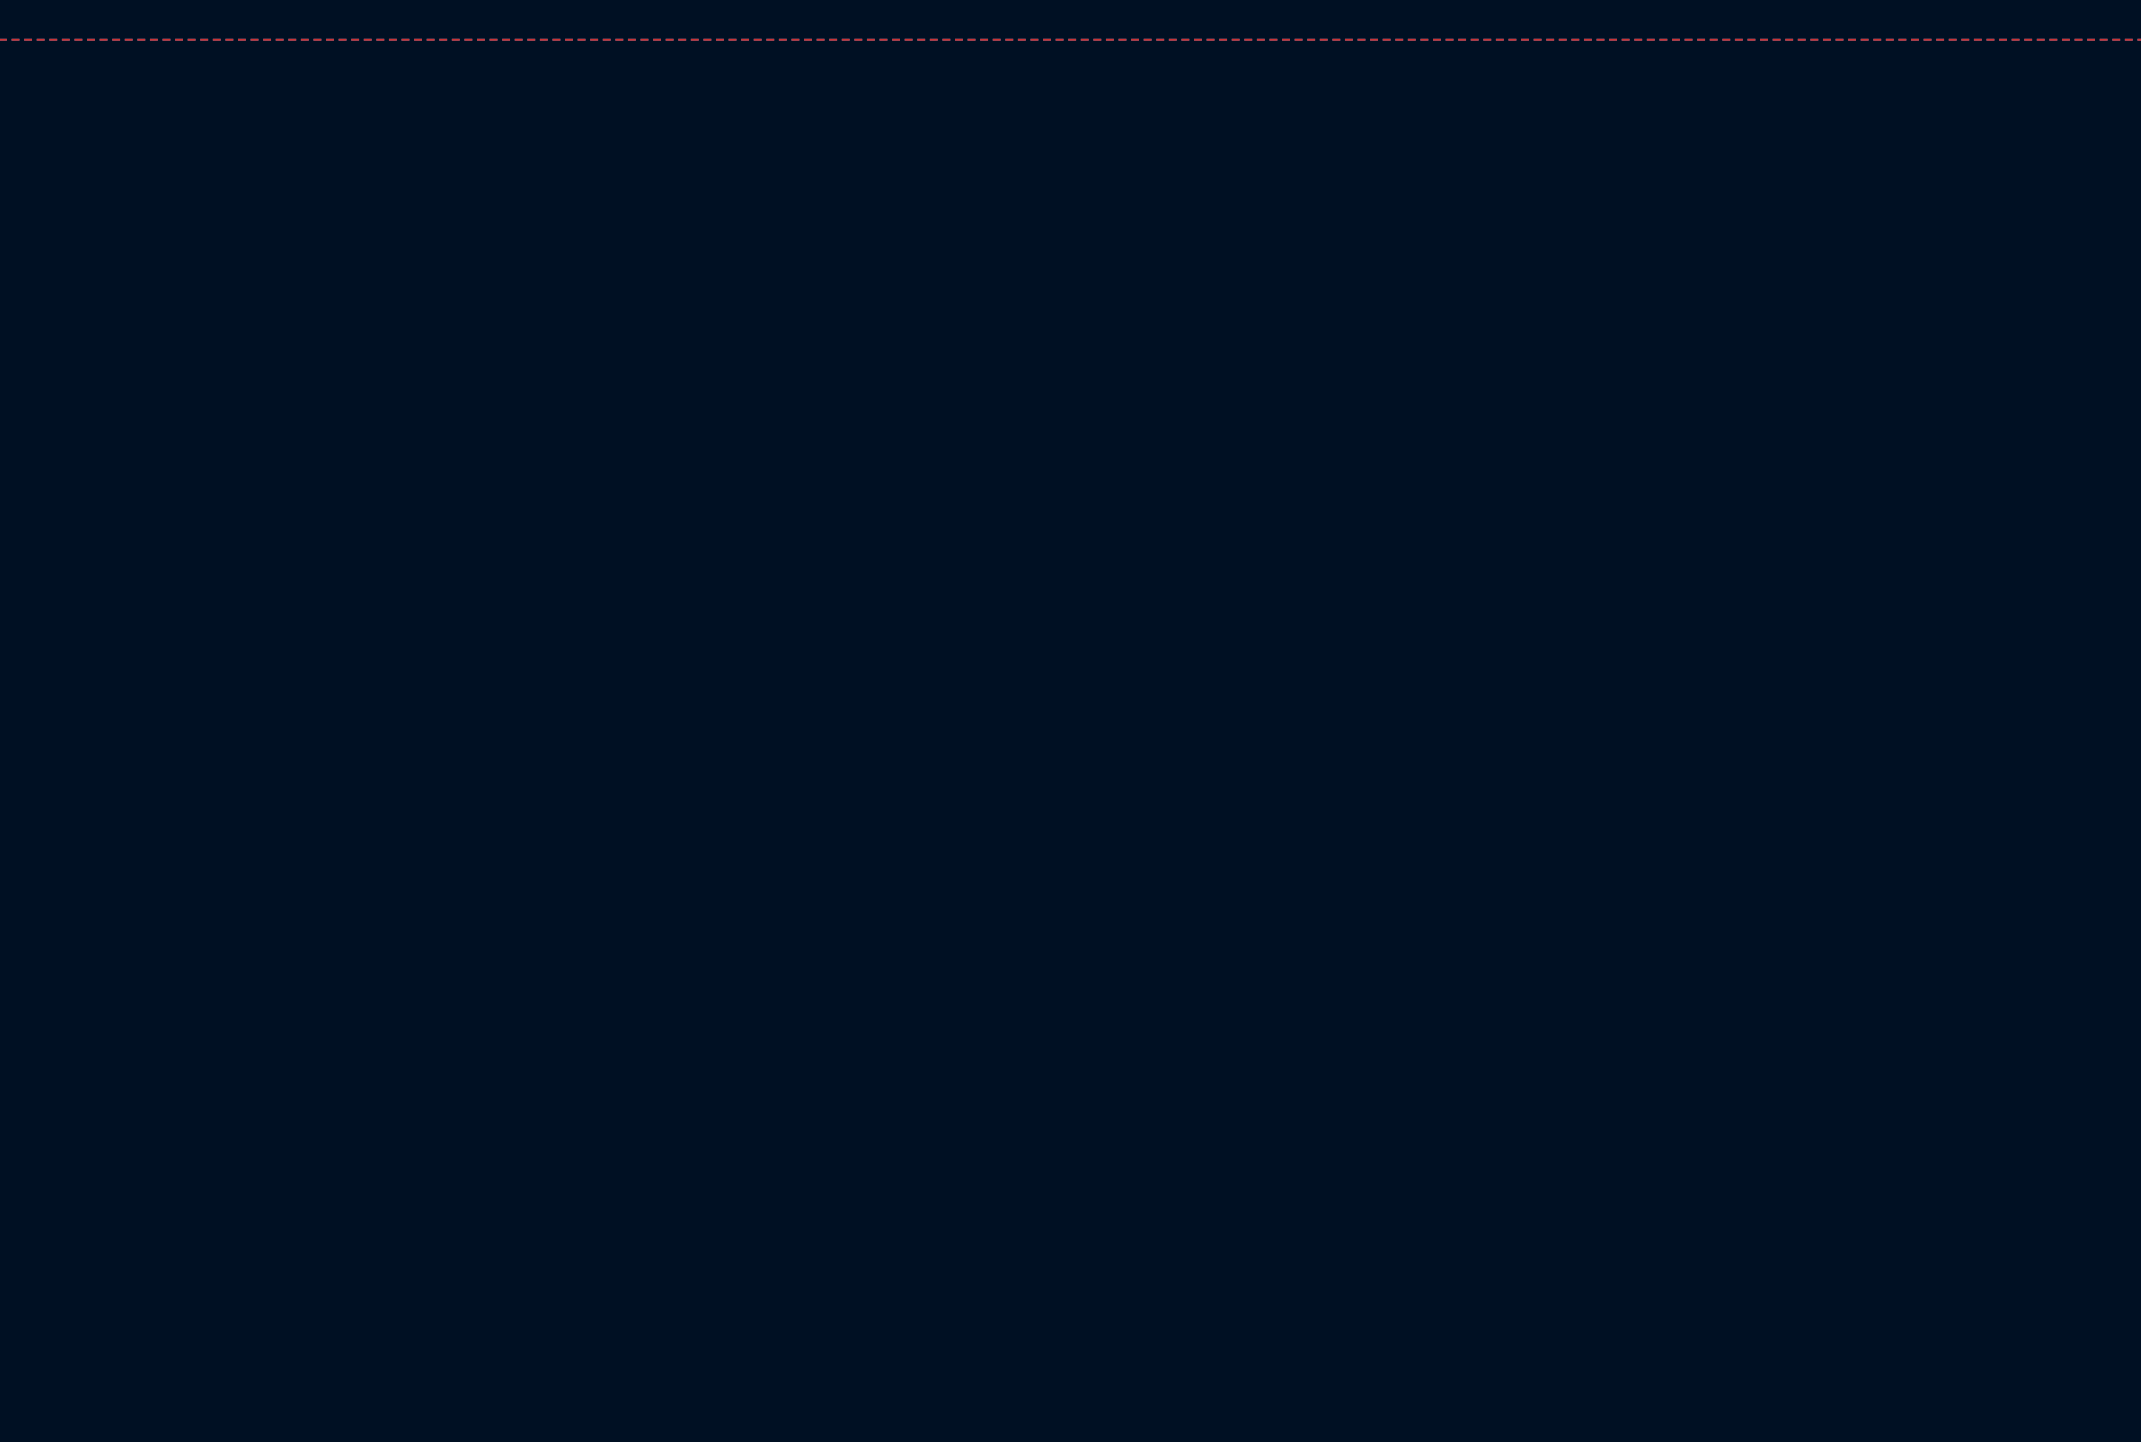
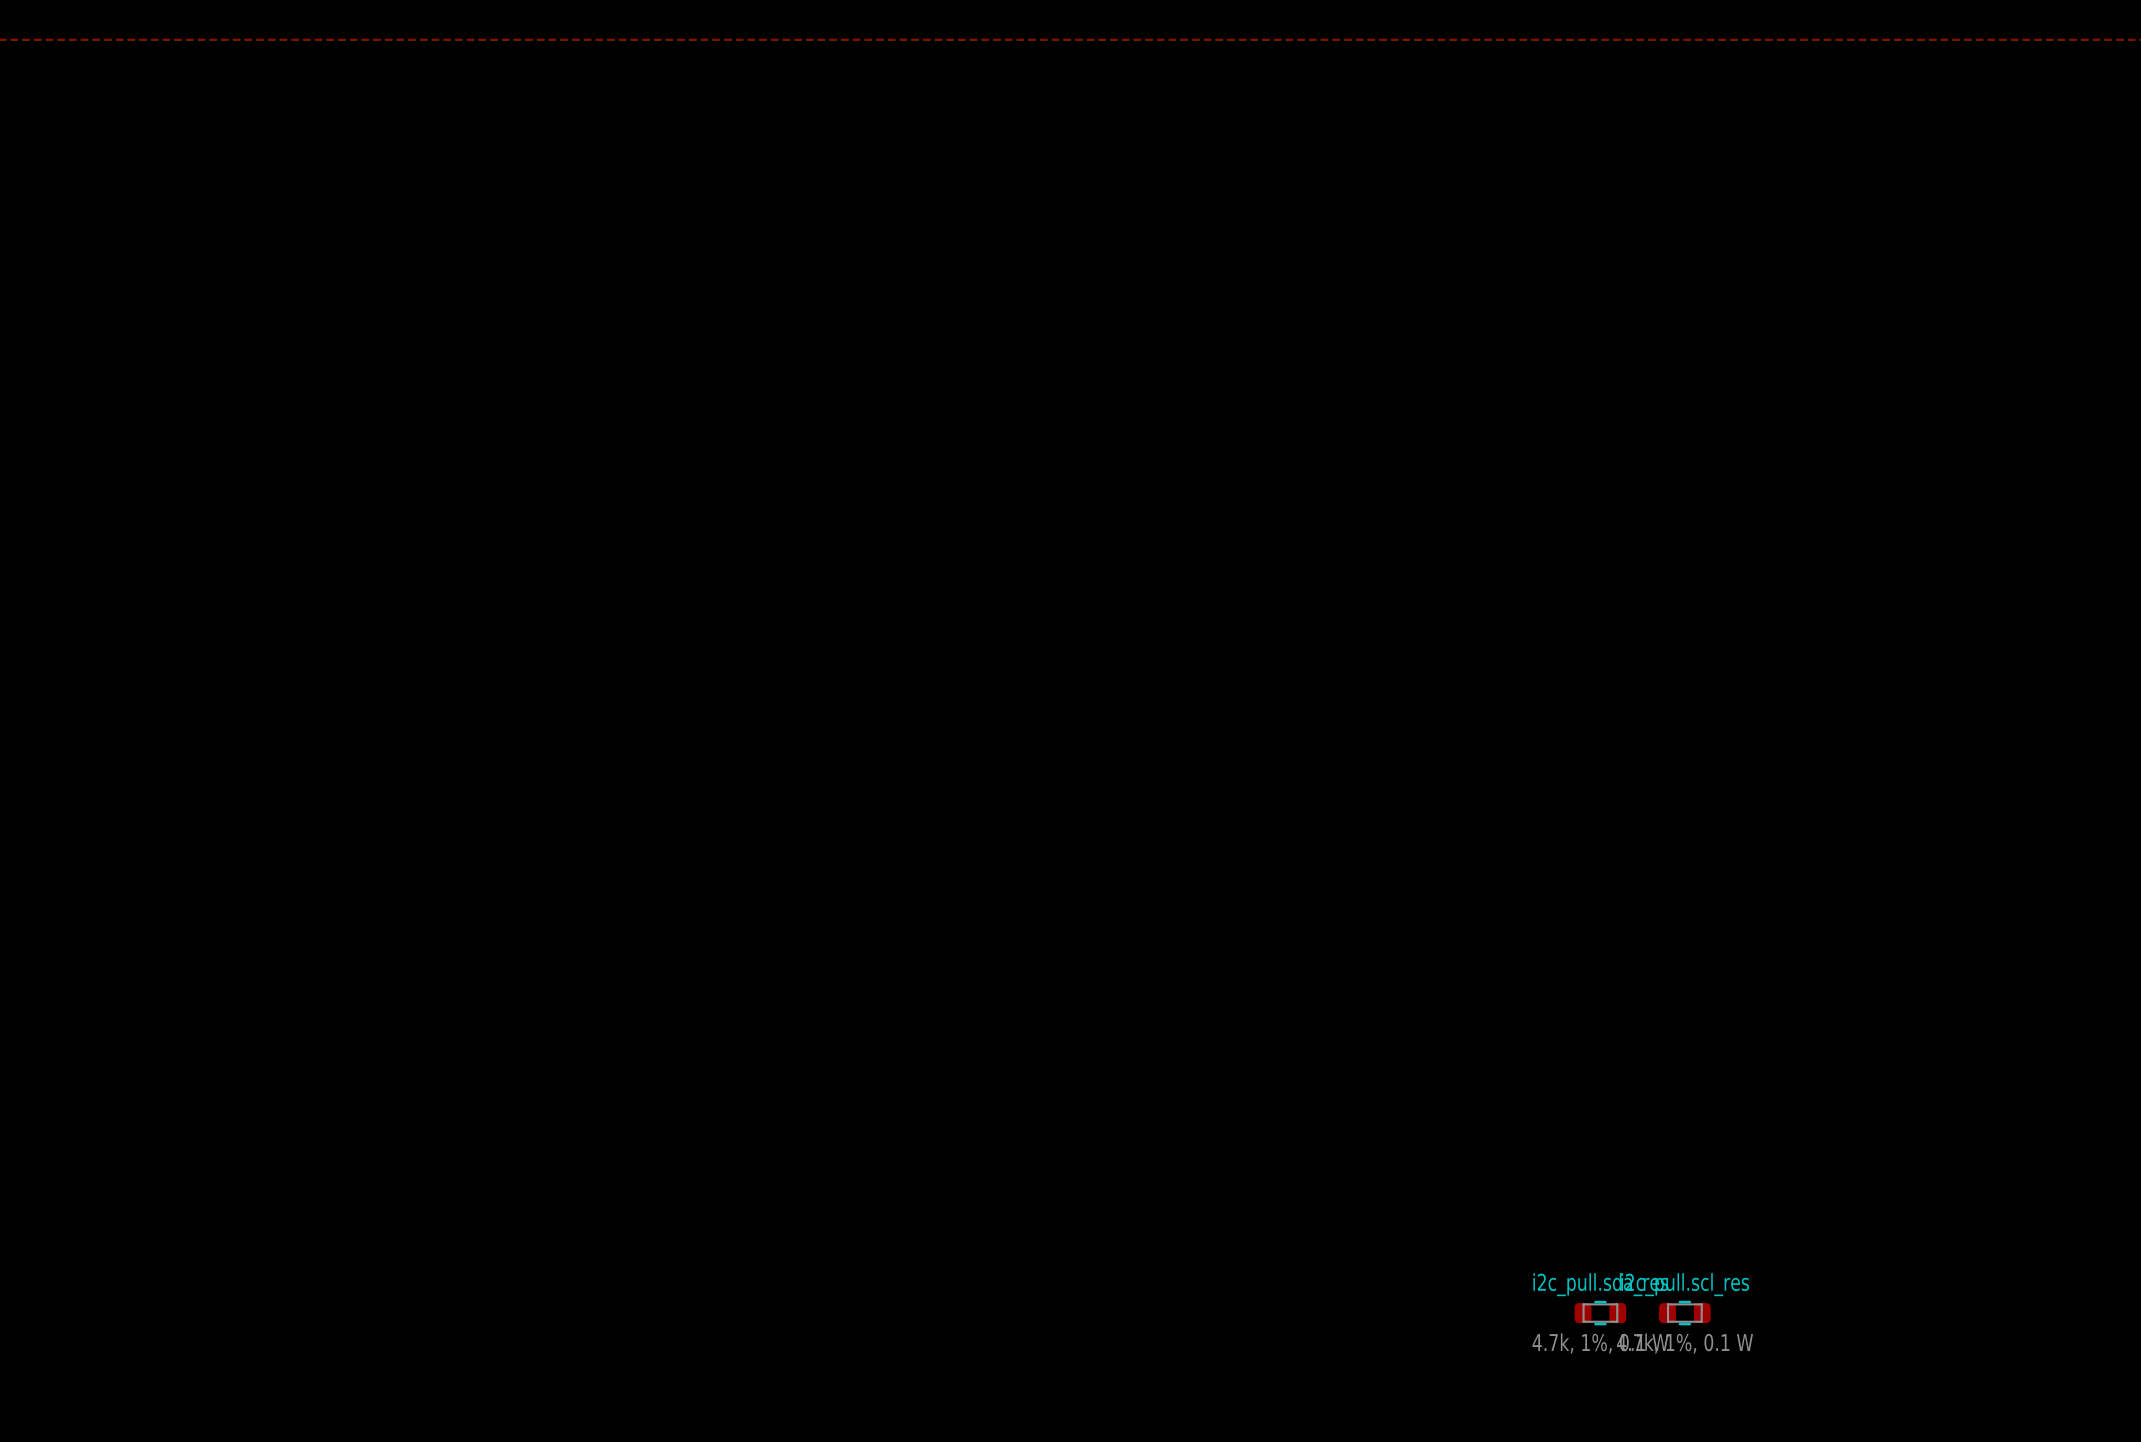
i2c_pull.sda_res: none -> 4.7k, 1%, 0.1 W (1600, 1313)
i2c_pull.scl_res: none -> 4.7k, 1%, 0.1 W (1684, 1313)

